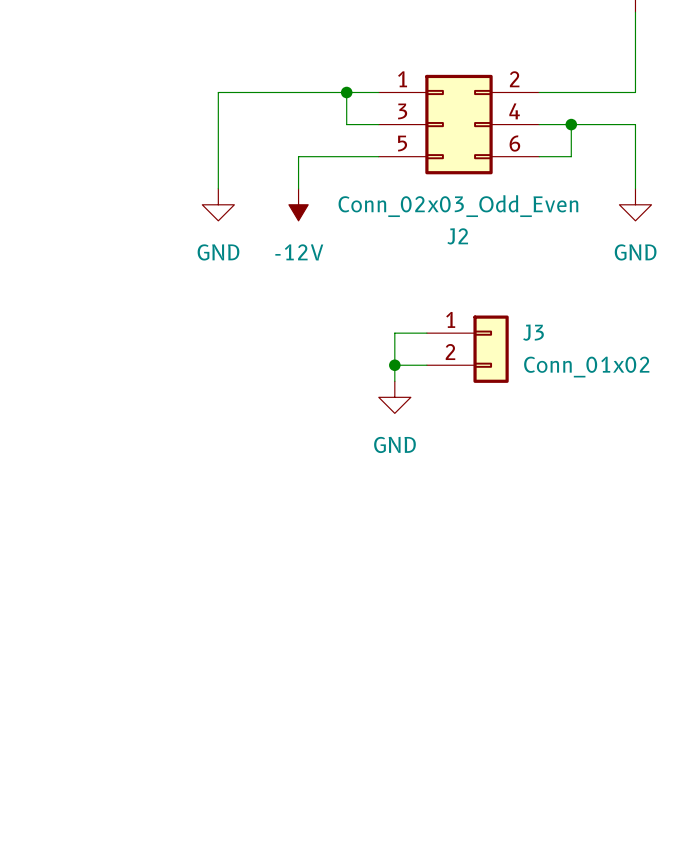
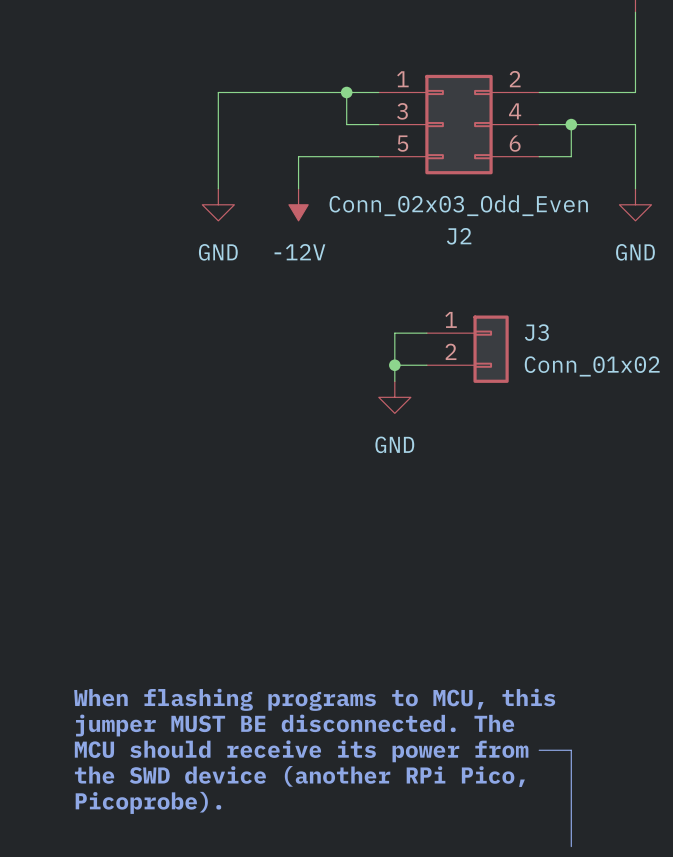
text: none -> When flashing programs to MCU, this (314, 699)
text: none -> jumper MUST BE disconnected. The (295, 725)
line: none -> (539, 750) (571, 750) (571, 846)
text: none -> MCU should receive its power from (301, 751)
text: none -> the SWD device (another RPi Pico, (299, 776)
text: none -> Picoprobe). (148, 802)

